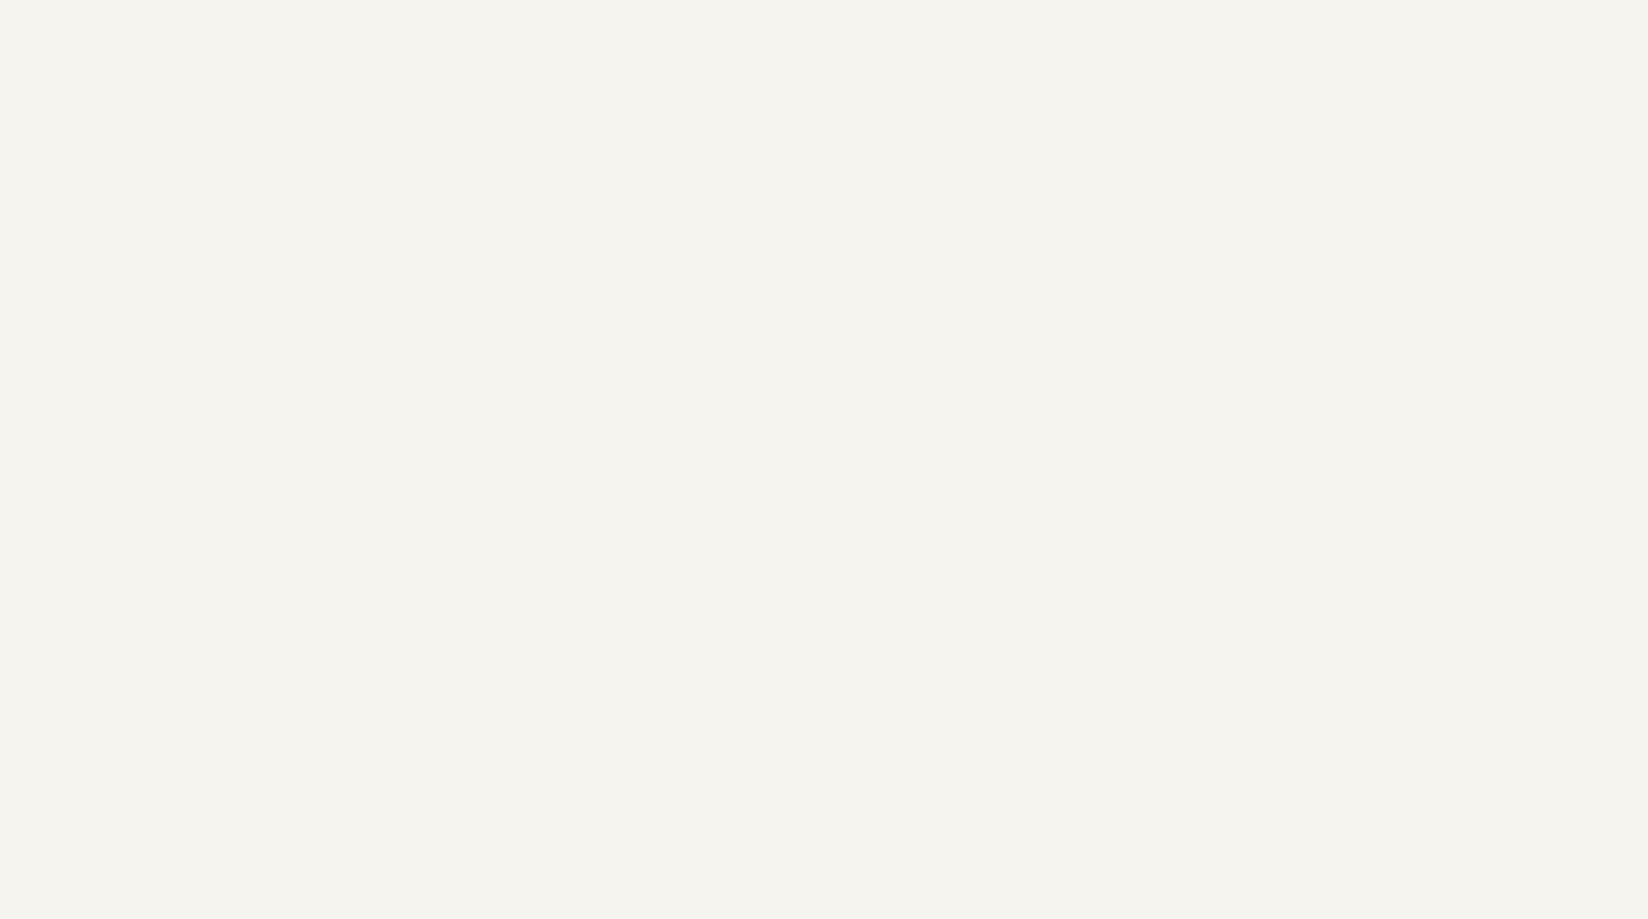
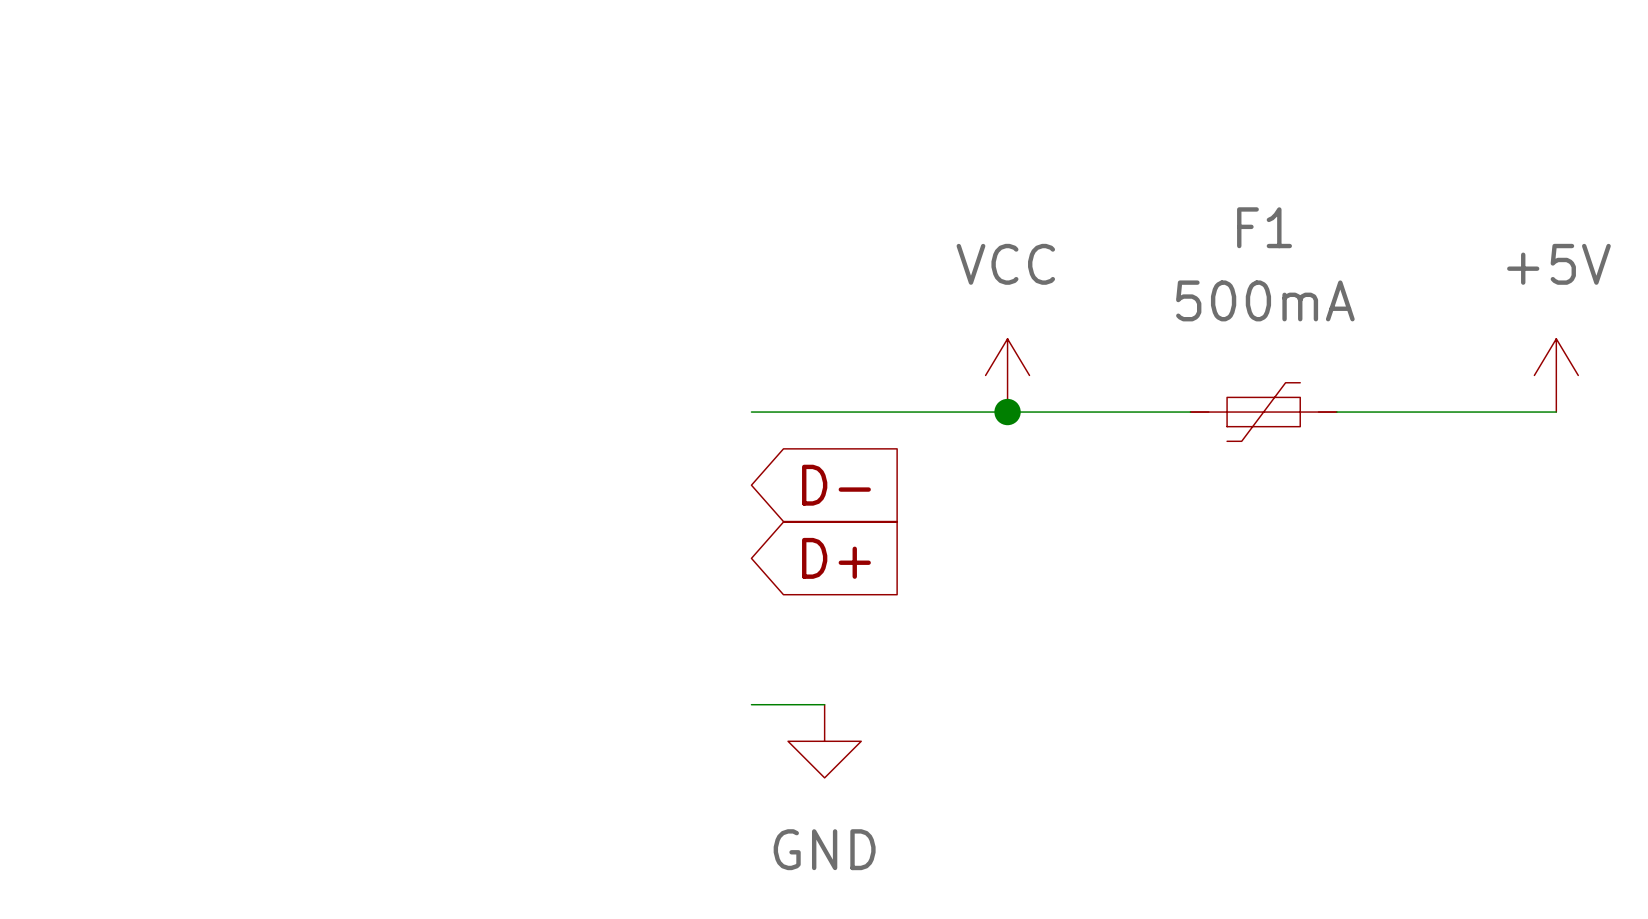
power symbol: none -> VCC (1007, 375)
power symbol: none -> +5V (1556, 375)
wire: none -> (751, 412) (1190, 412)
junction: none -> (1007, 412)
F1: none -> 500mA (1263, 412)
wire: none -> (1336, 412) (1556, 412)
global label: none -> D- (836, 485)
global label: none -> D+ (836, 558)
wire: none -> (751, 704) (824, 704)
power symbol: none -> GND (824, 741)

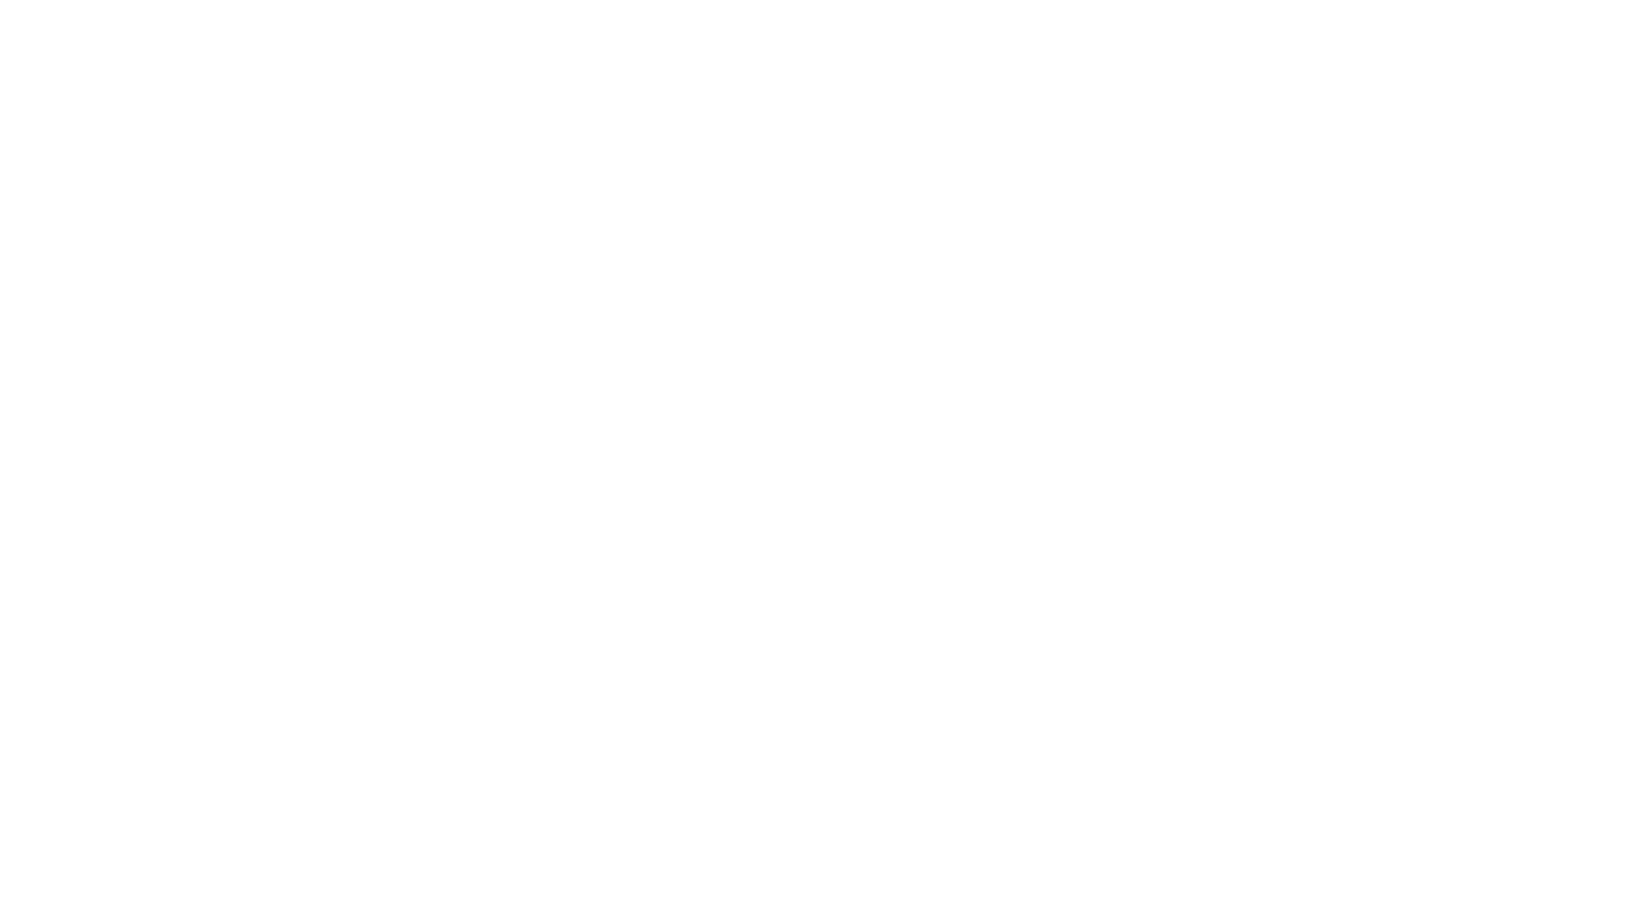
power symbol: VCC (1007, 375) -> none
power symbol: +5V (1556, 375) -> none
wire: (751, 412) (1190, 412) -> none
junction: (1007, 412) -> none
F1: 500mA (1263, 412) -> none
wire: (1336, 412) (1556, 412) -> none
global label: D- (836, 485) -> none
global label: D+ (836, 558) -> none
wire: (751, 704) (824, 704) -> none
power symbol: GND (824, 741) -> none

